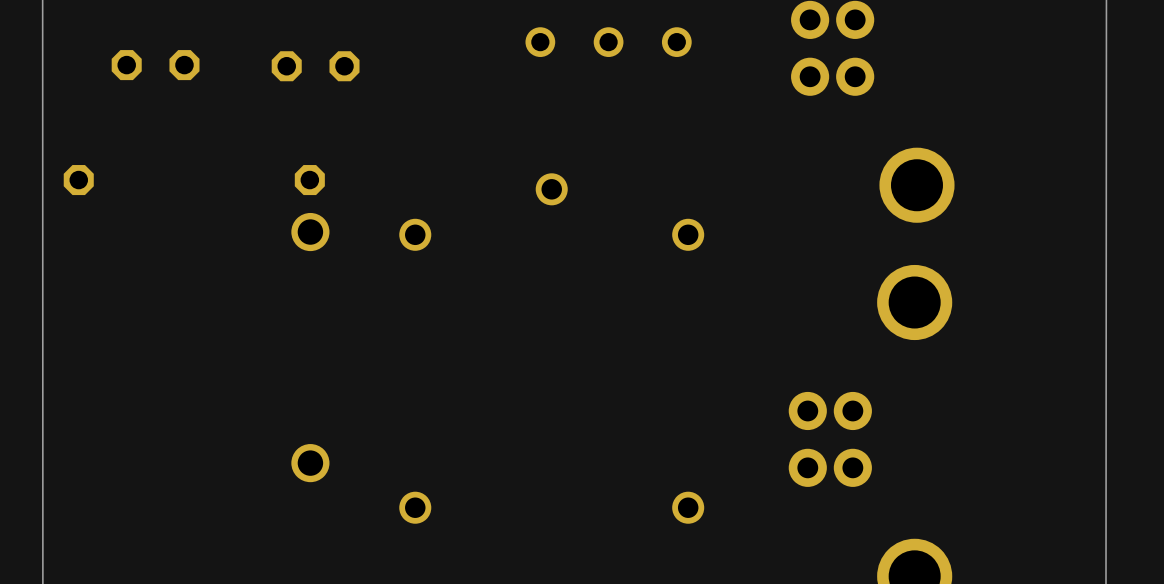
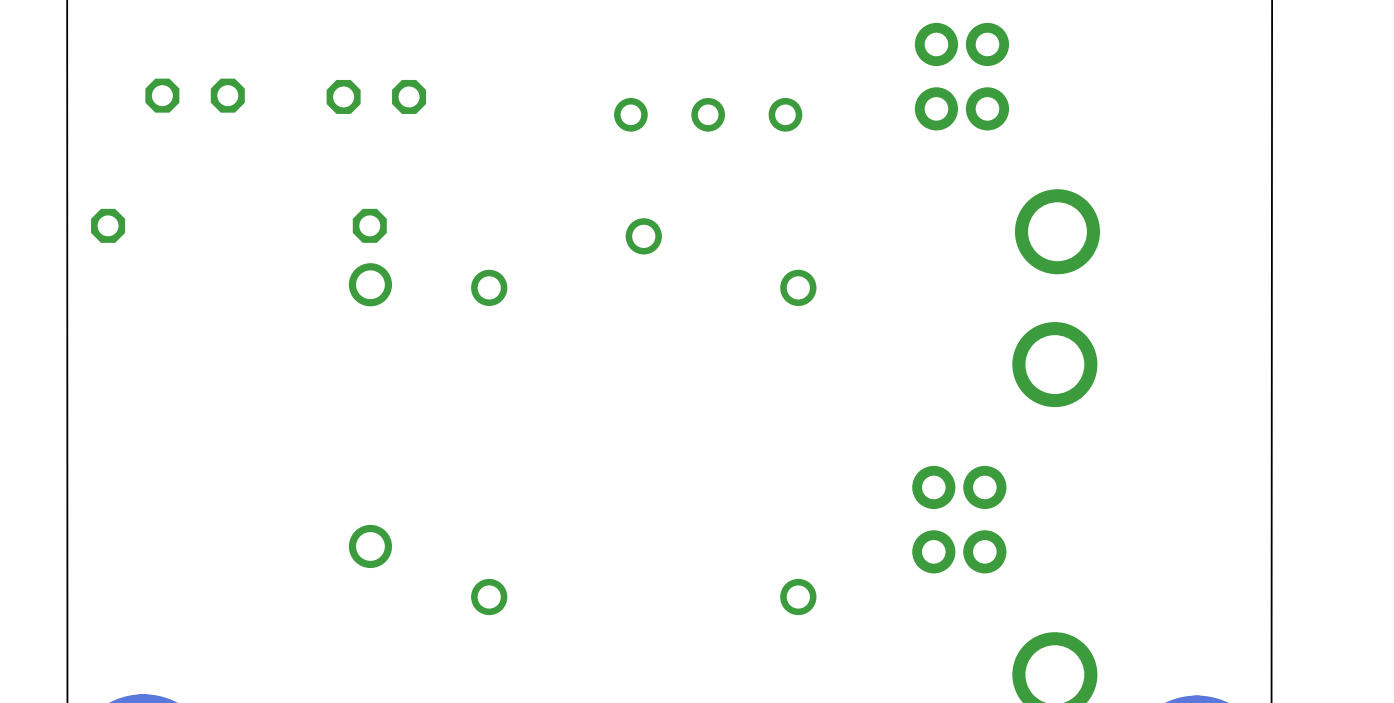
part position: (608, 42) -> (708, 114)

